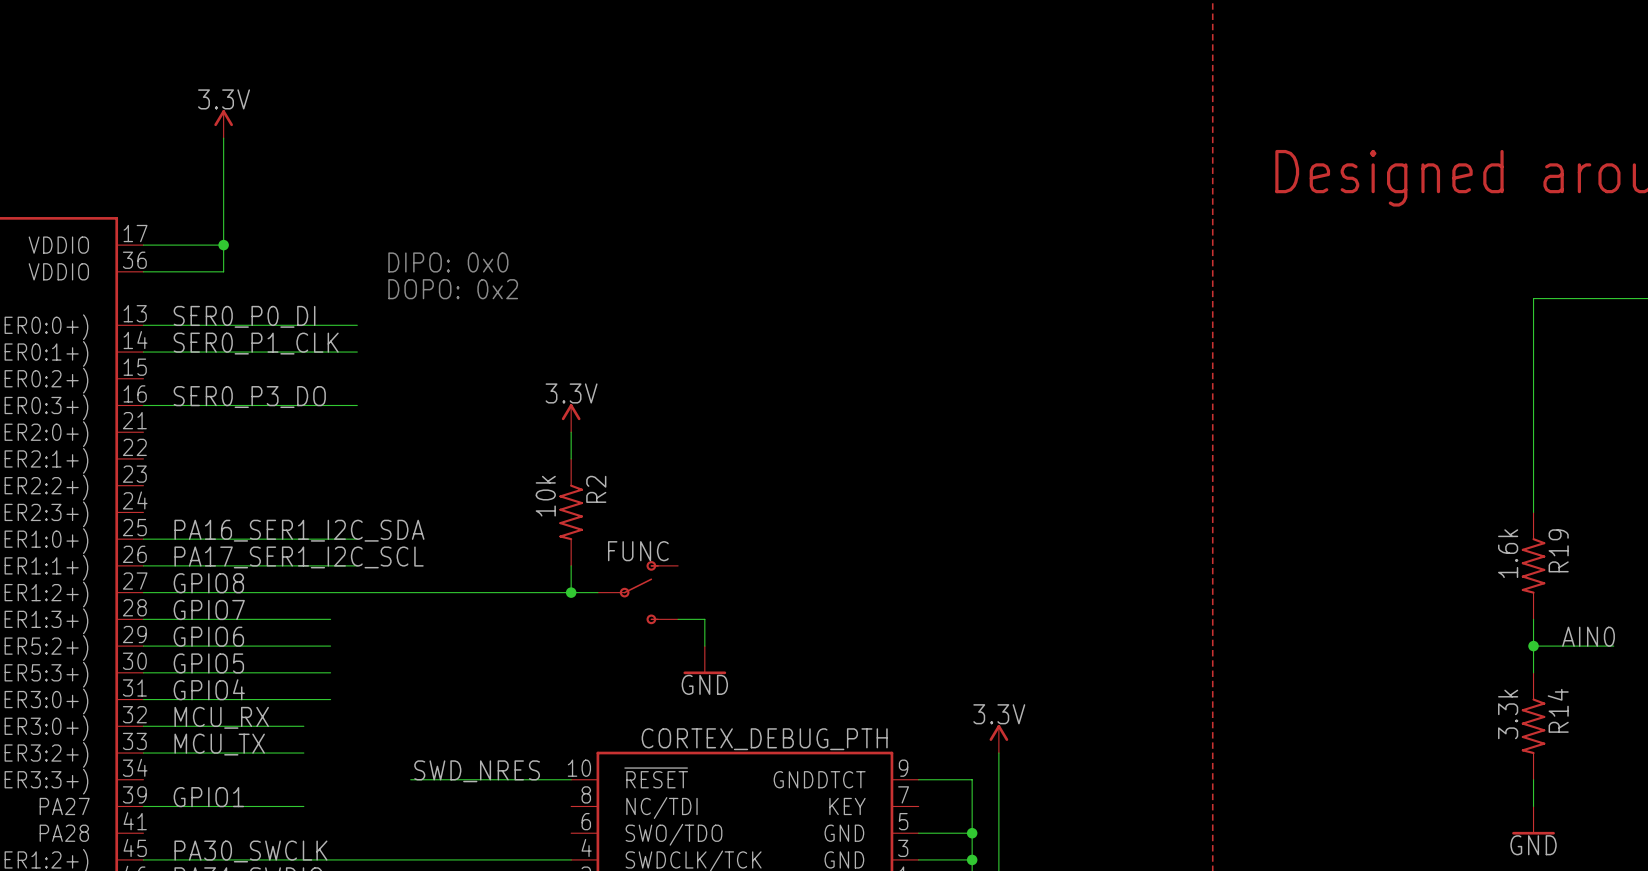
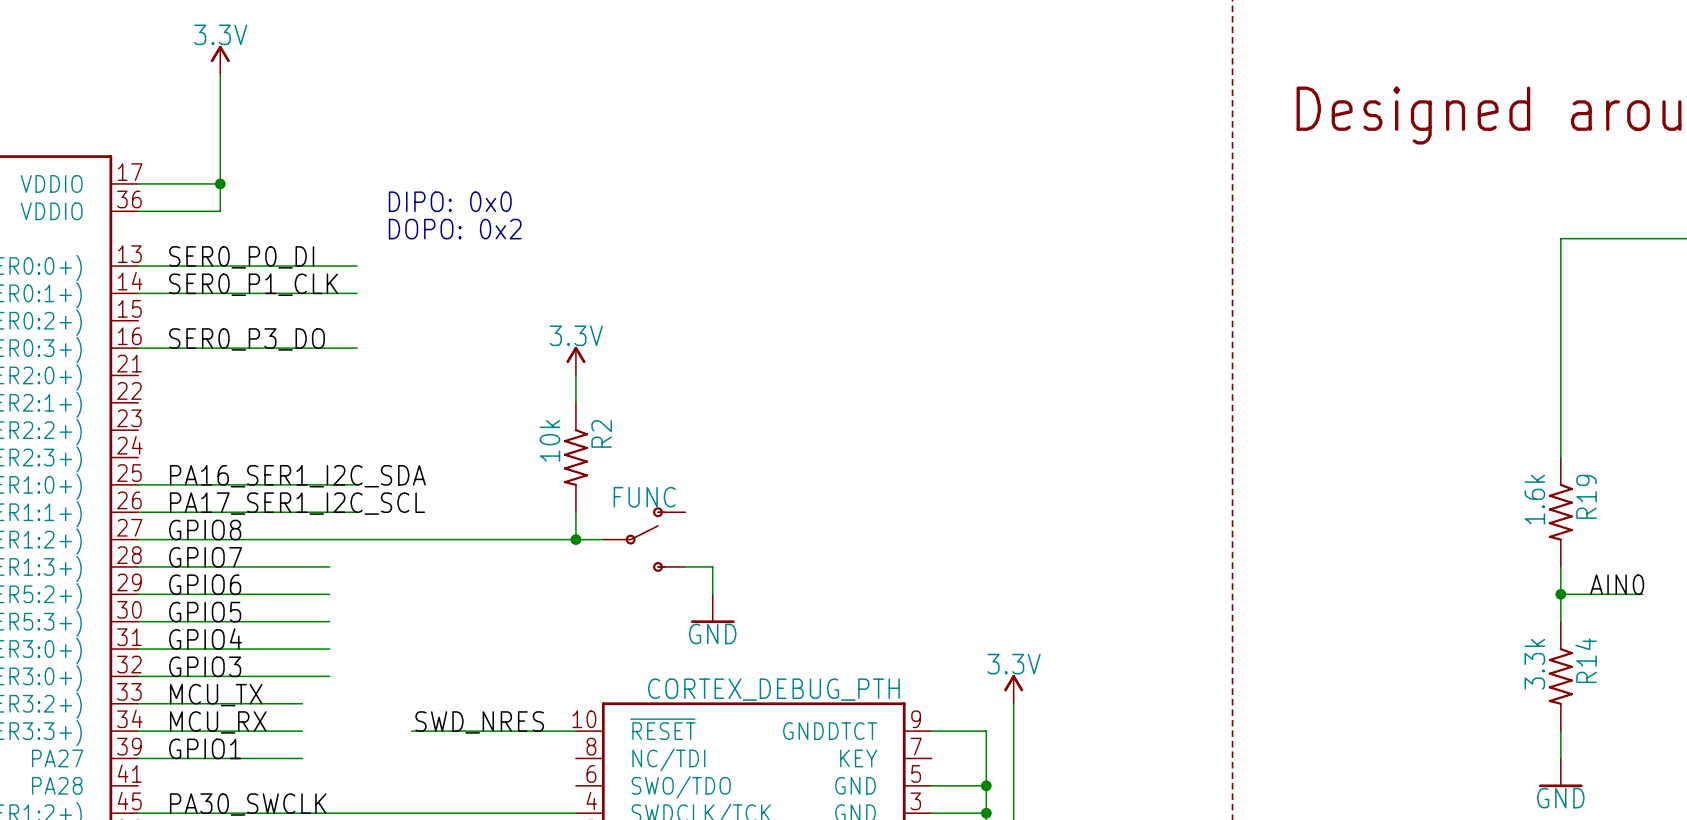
label: MCU_RX (221, 717) -> GPIO3 (205, 666)
wire: none -> (302, 676) (329, 676)
label: none -> MCU_RX (218, 722)
wire: none -> (138, 731) (302, 731)

